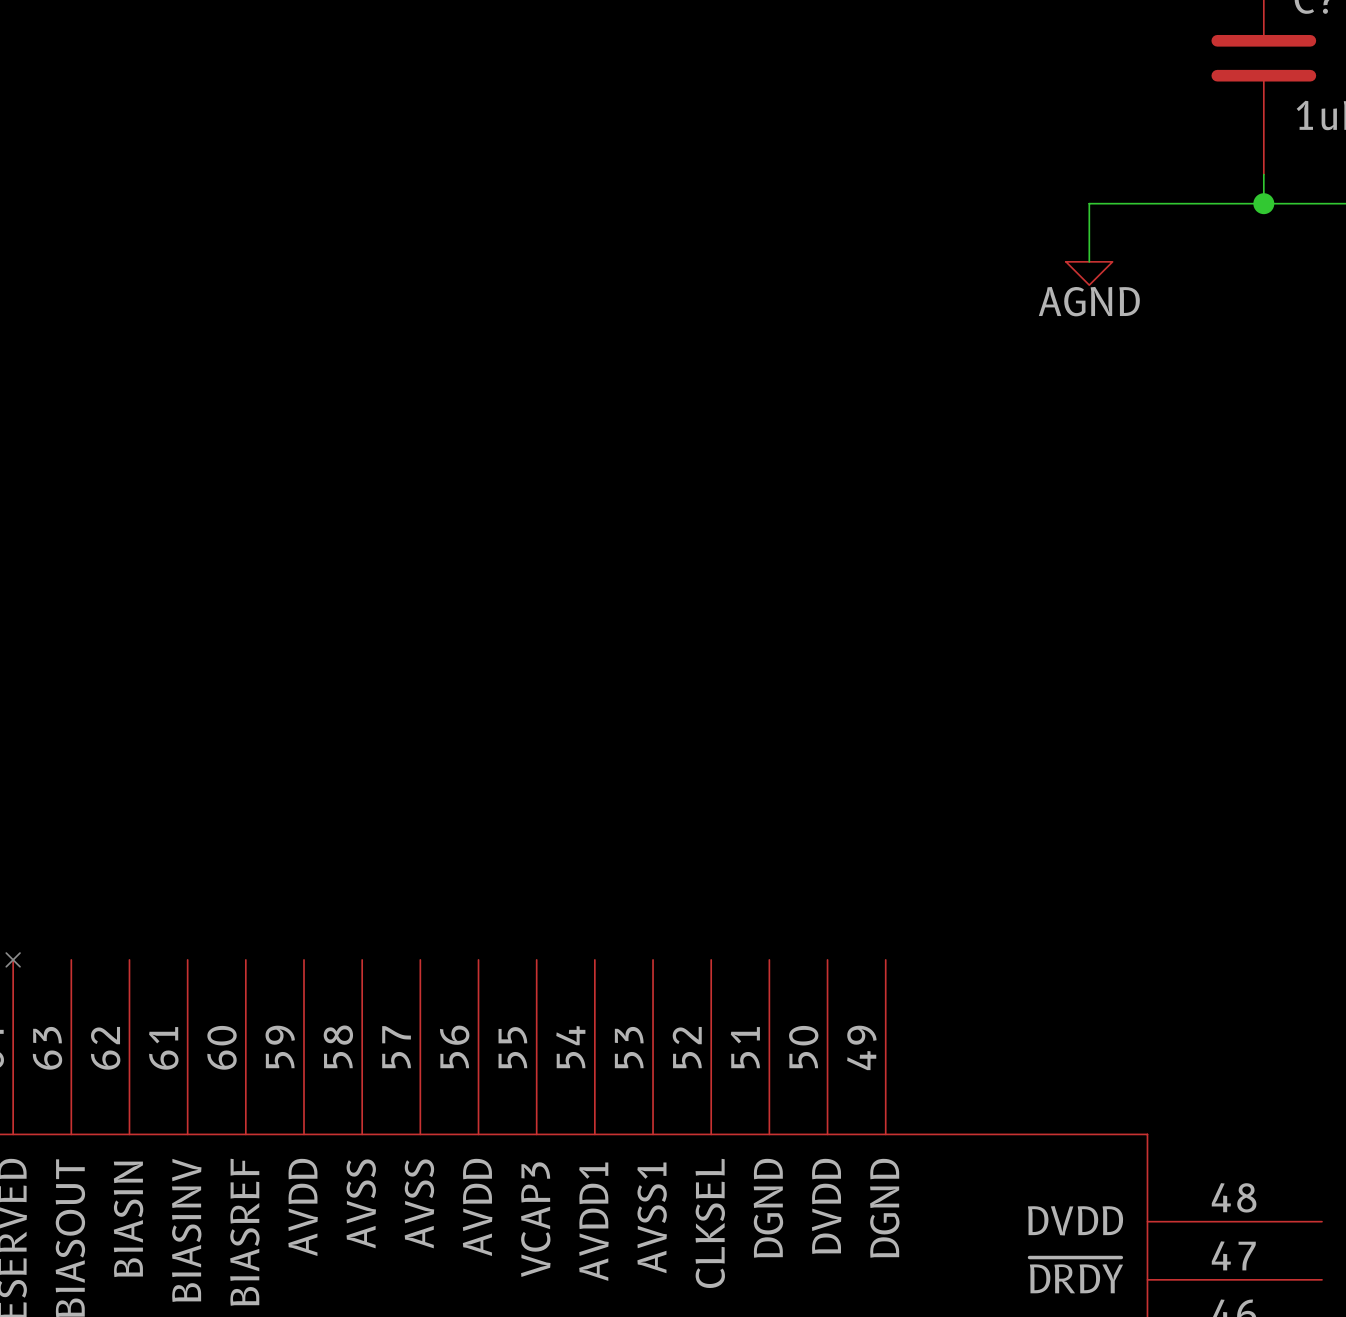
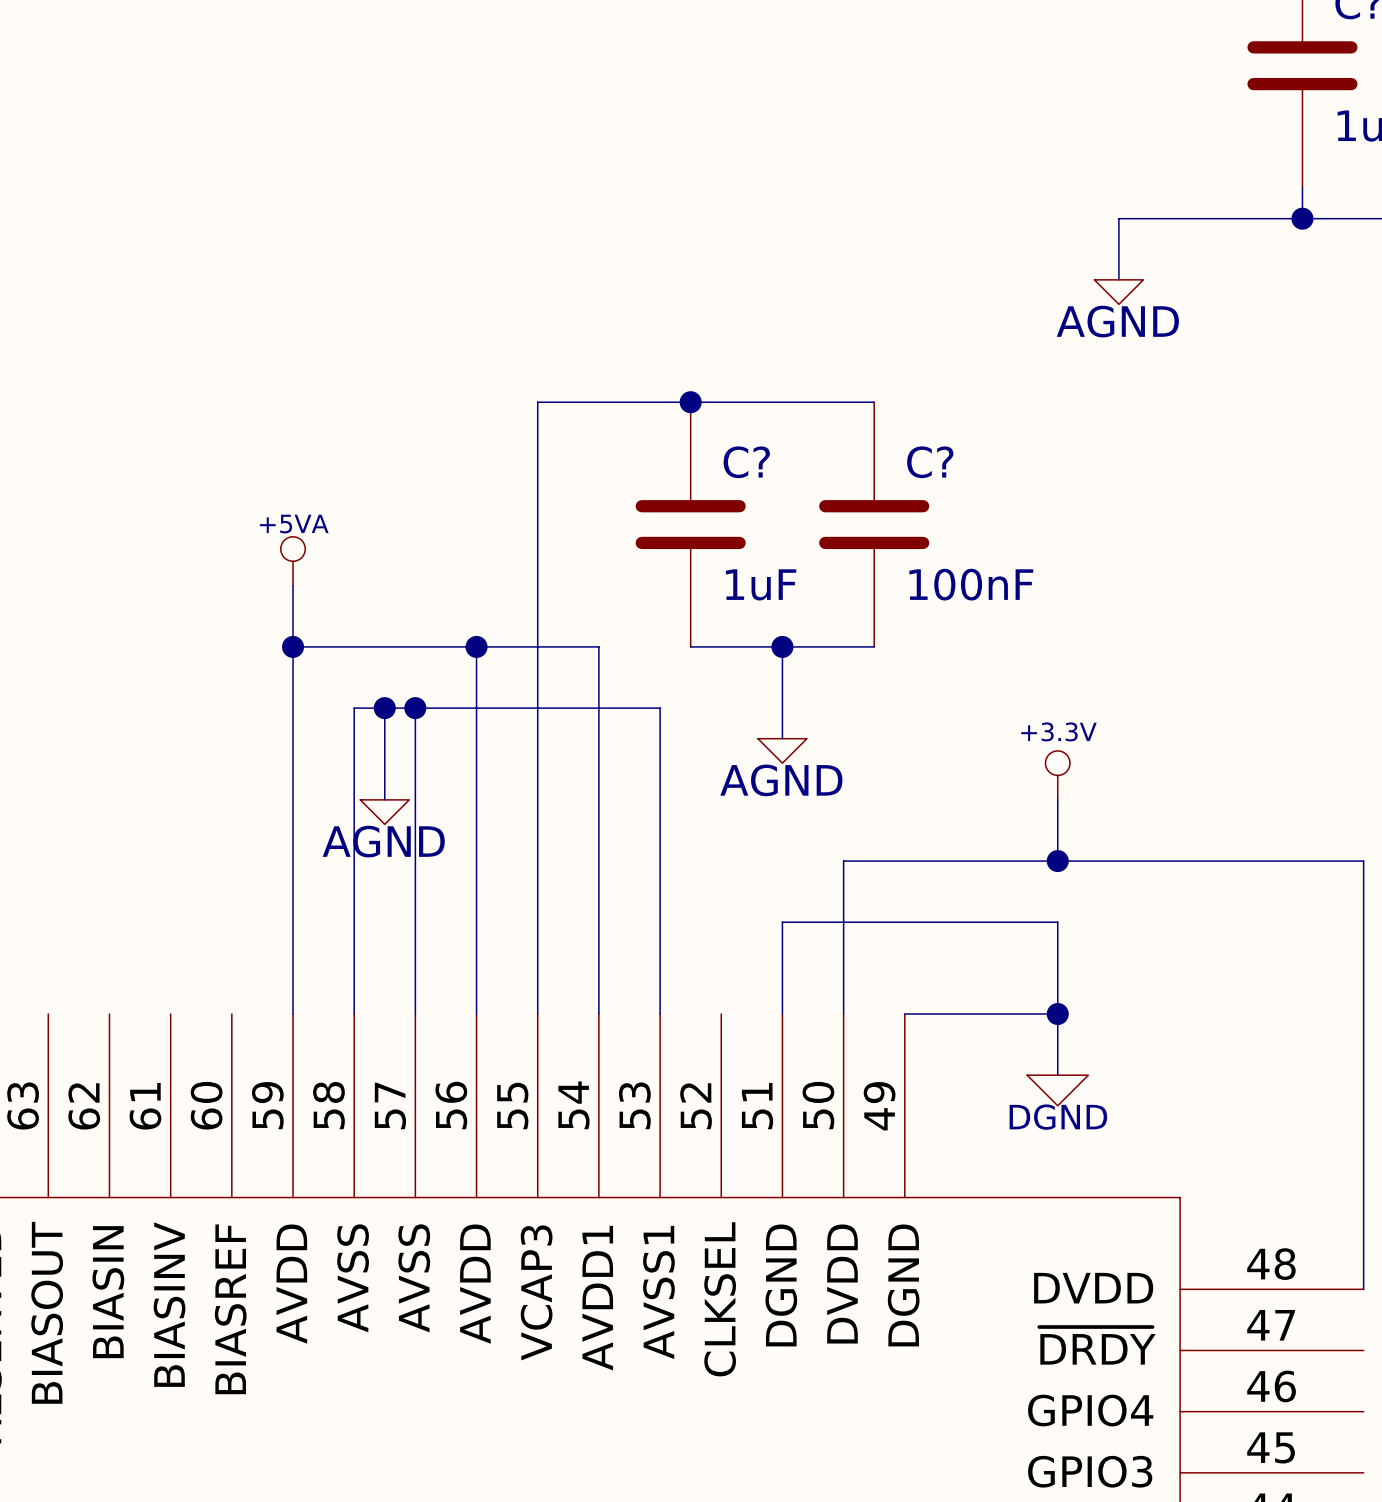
junction: none -> (690, 402)
wire: none -> (874, 402) (537, 402) (537, 1014)
C?: none -> 1uF (690, 524)
C?: none -> 100nF (874, 524)
power symbol: none -> +5VA (293, 561)
wire: none -> (293, 585) (293, 1014)
wire: none -> (293, 646) (598, 646) (598, 1014)
junction: none -> (293, 646)
wire: none -> (476, 646) (476, 1014)
junction: none -> (476, 646)
wire: none -> (690, 646) (874, 646)
wire: none -> (782, 646) (782, 738)
junction: none -> (782, 646)
wire: none -> (384, 708) (384, 799)
junction: none -> (384, 708)
wire: none -> (415, 708) (415, 1014)
junction: none -> (415, 708)
power symbol: none -> AGND (782, 750)
power symbol: none -> +3.3V (1057, 775)
wire: none -> (1057, 799) (1057, 861)
power symbol: none -> AGND (384, 812)
junction: none -> (1057, 861)
wire: none -> (354, 1014) (354, 708) (660, 708) (660, 1014)
wire: none -> (782, 1014) (782, 922) (1057, 922) (1057, 1075)
wire: none -> (843, 1014) (843, 861) (1363, 861) (1363, 1289)
wire: none -> (904, 1014) (1057, 1014)
junction: none -> (1057, 1014)
power symbol: none -> DGND (1057, 1090)

